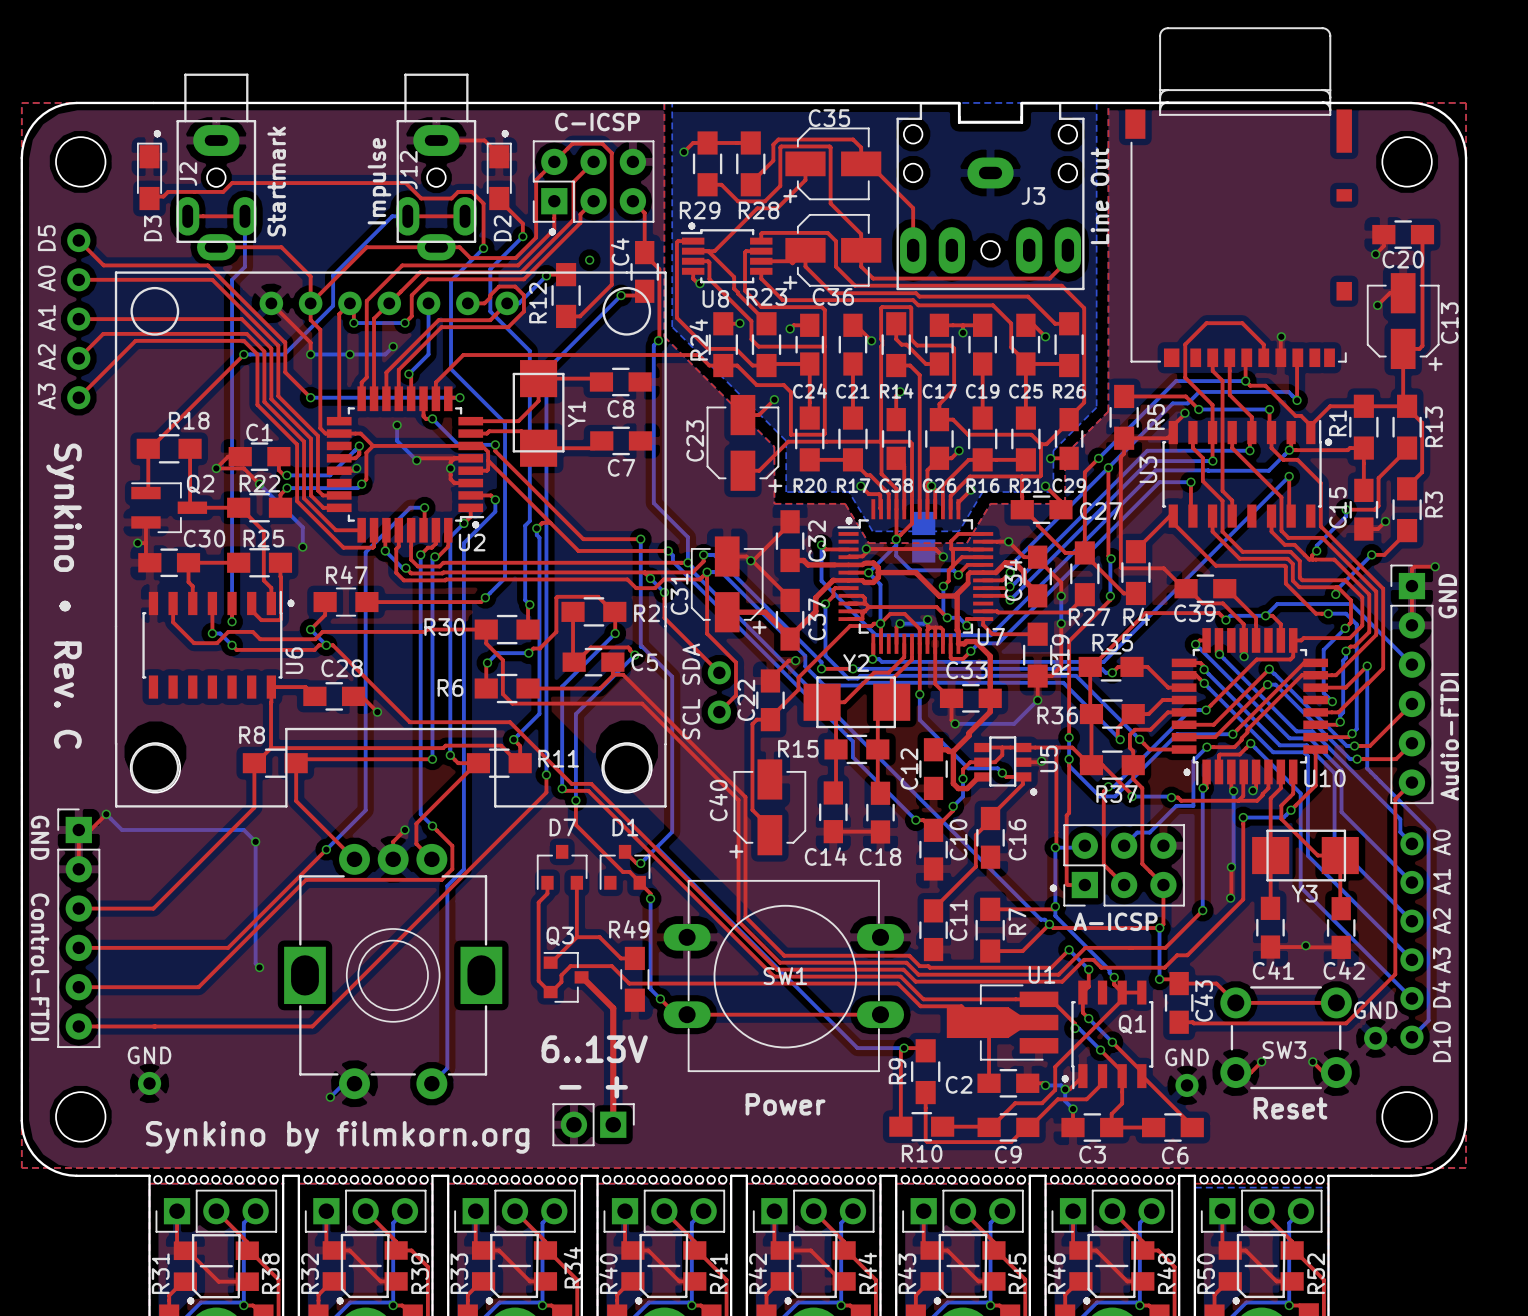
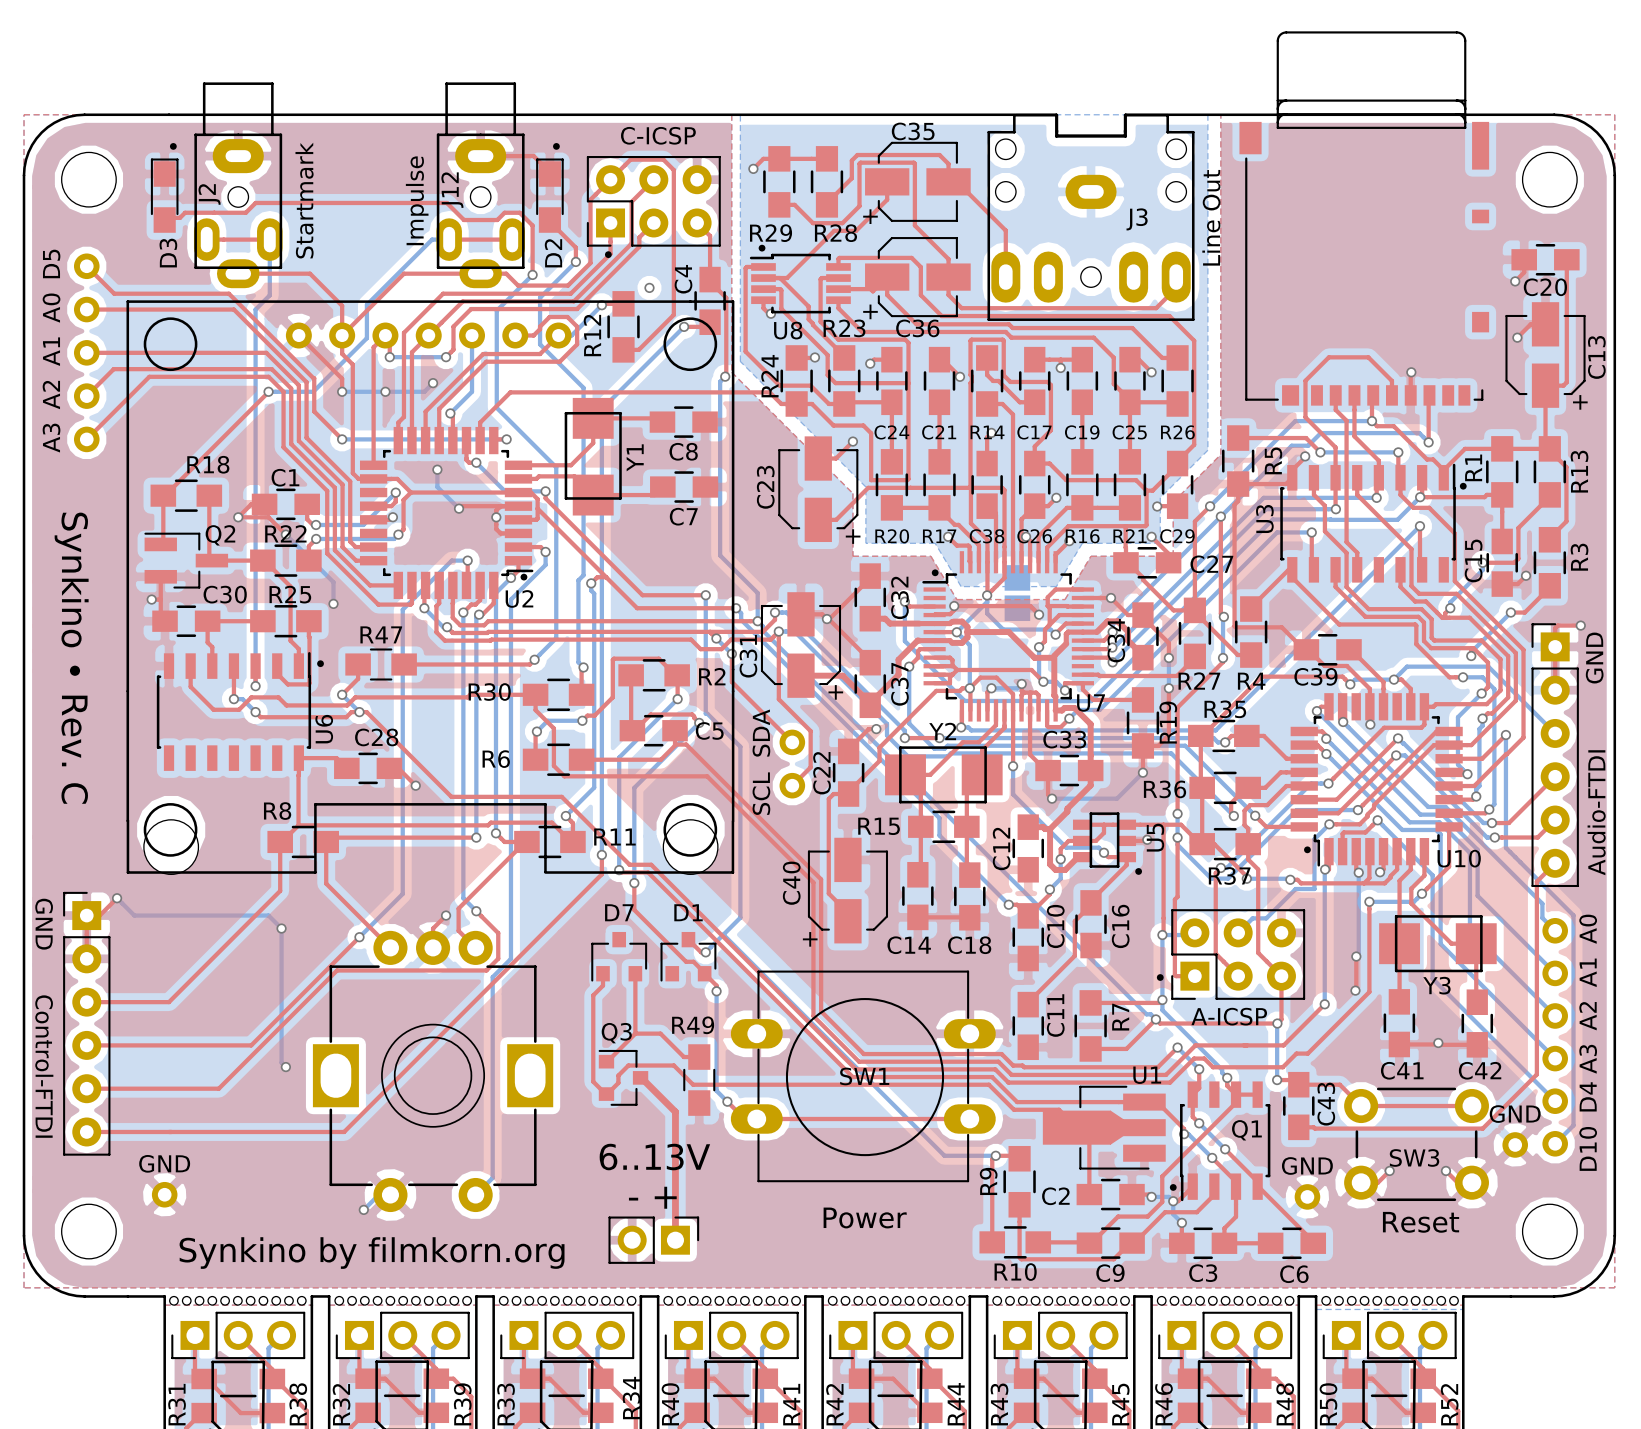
part footprint: [114, 271, 667, 808] -> [126, 300, 735, 874]

